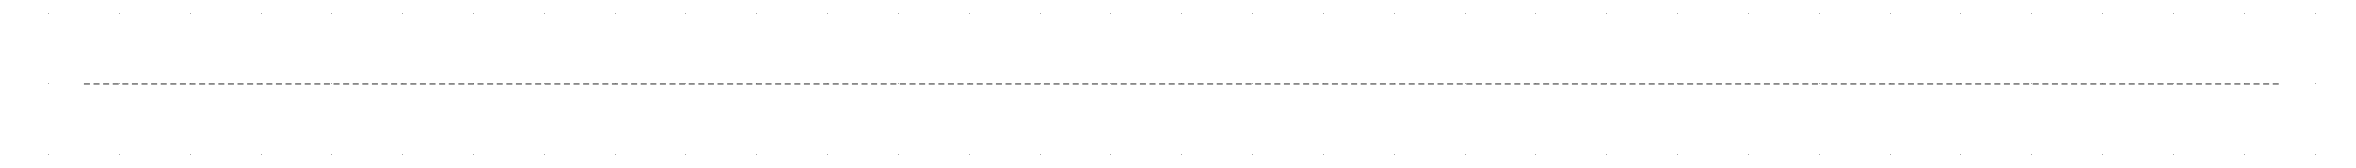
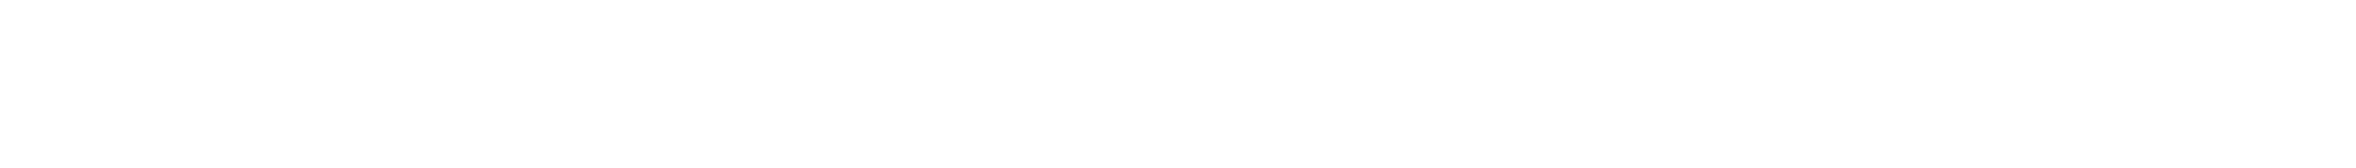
line: (83, 83) (2279, 83) -> none

